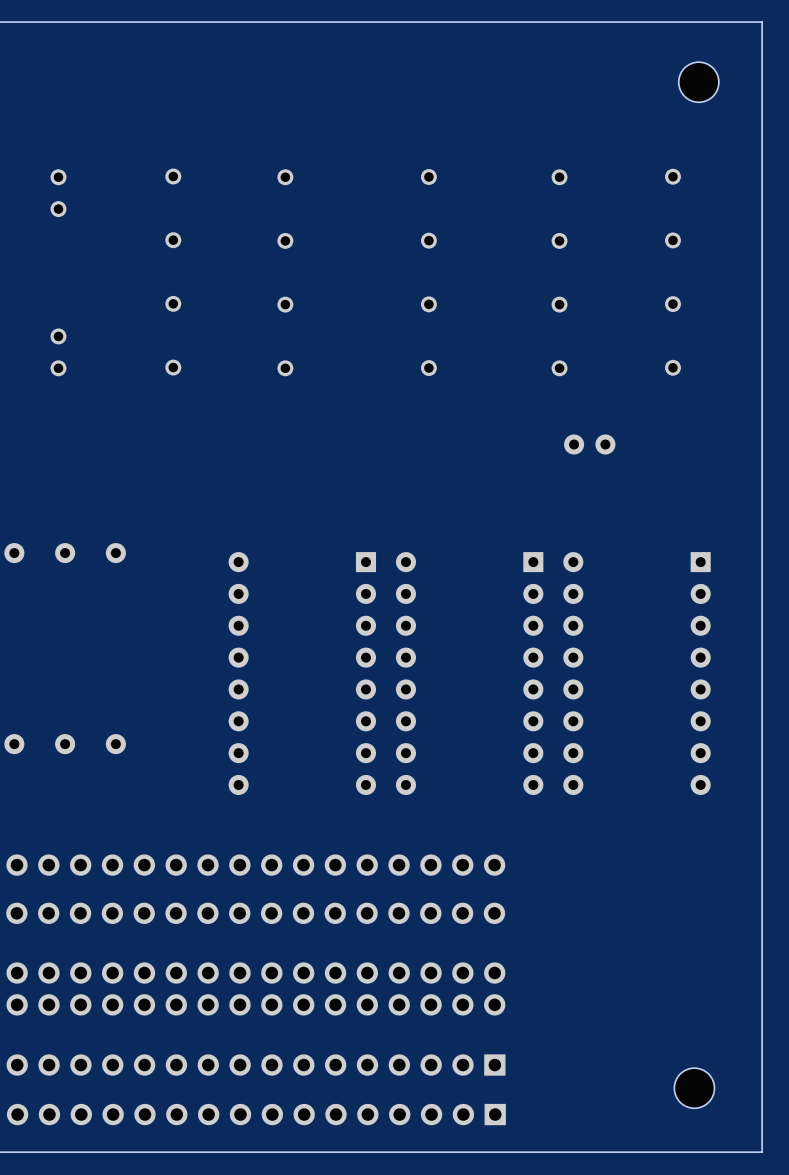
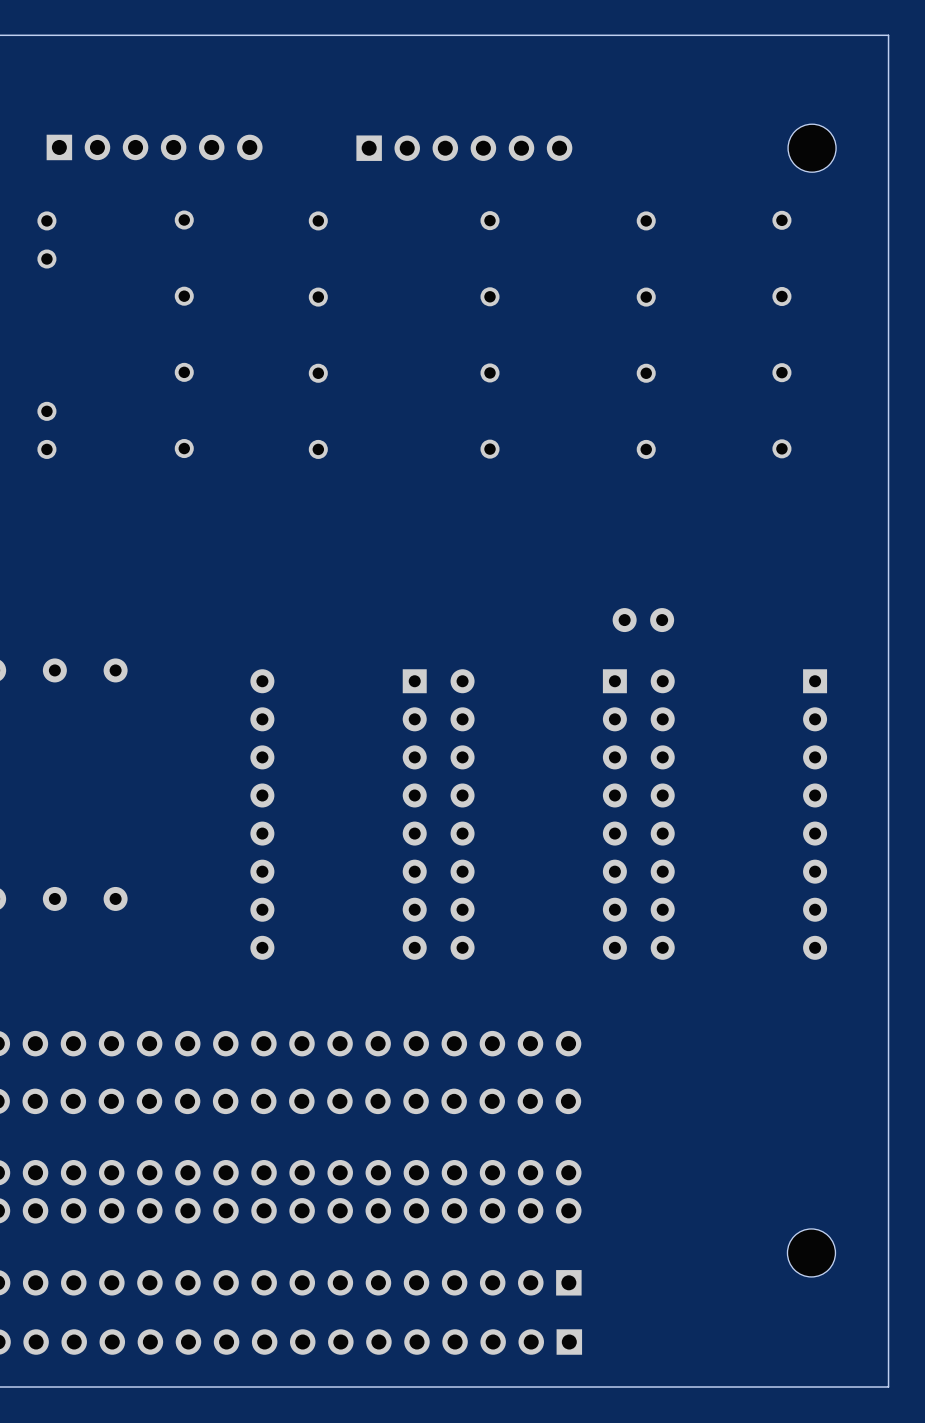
part position: (698, 82) -> (812, 148)
part: none -> (154, 147)
part: none -> (464, 148)
part position: (589, 444) -> (643, 620)
part position: (694, 1088) -> (811, 1252)

